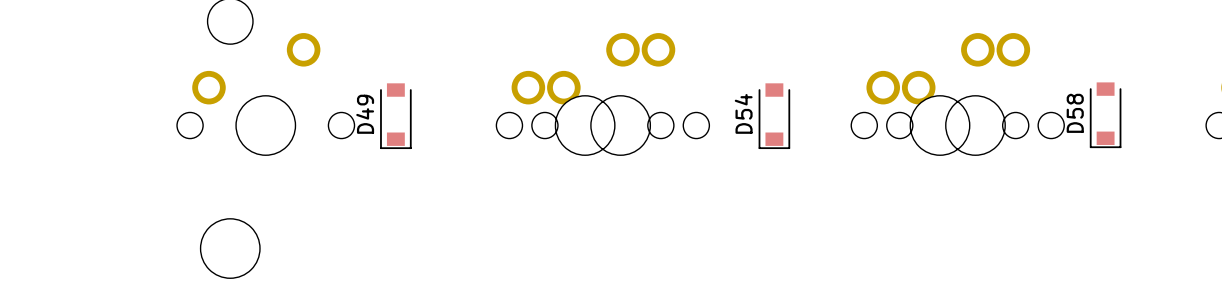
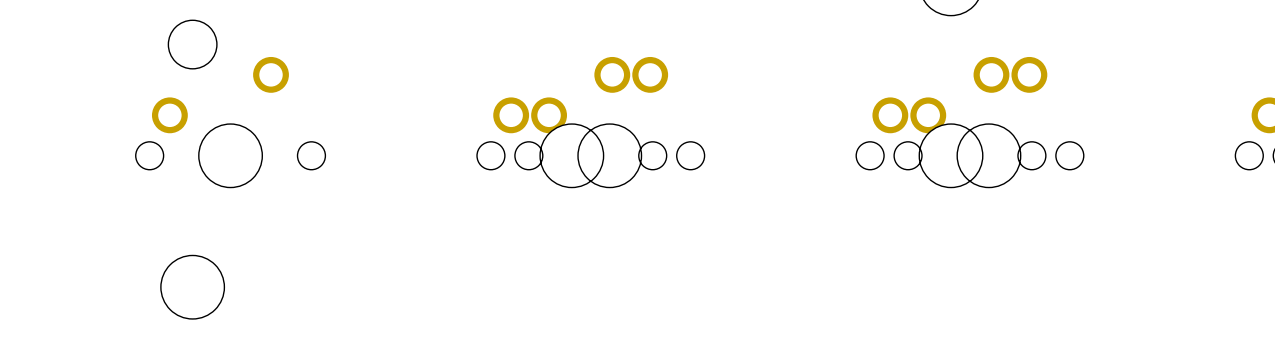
D58: (1105, 115) -> none
D49: (395, 116) -> none
D54: (774, 116) -> none

